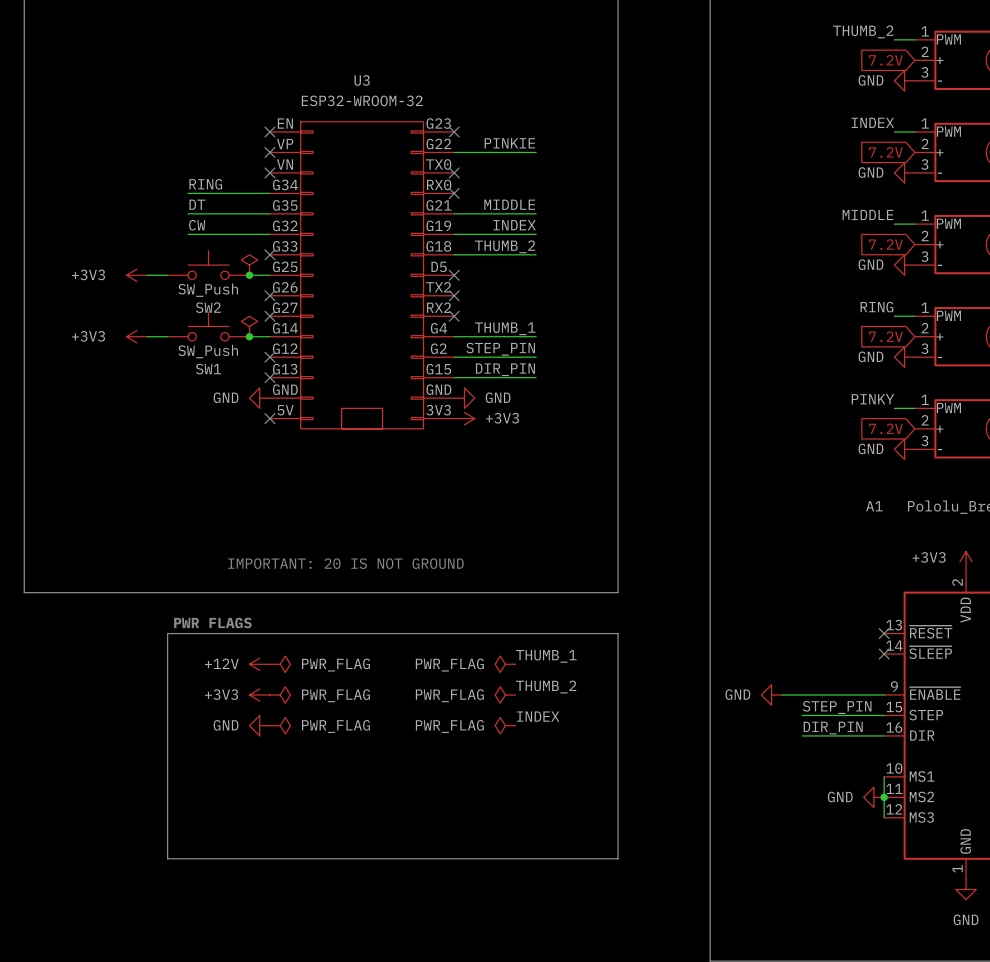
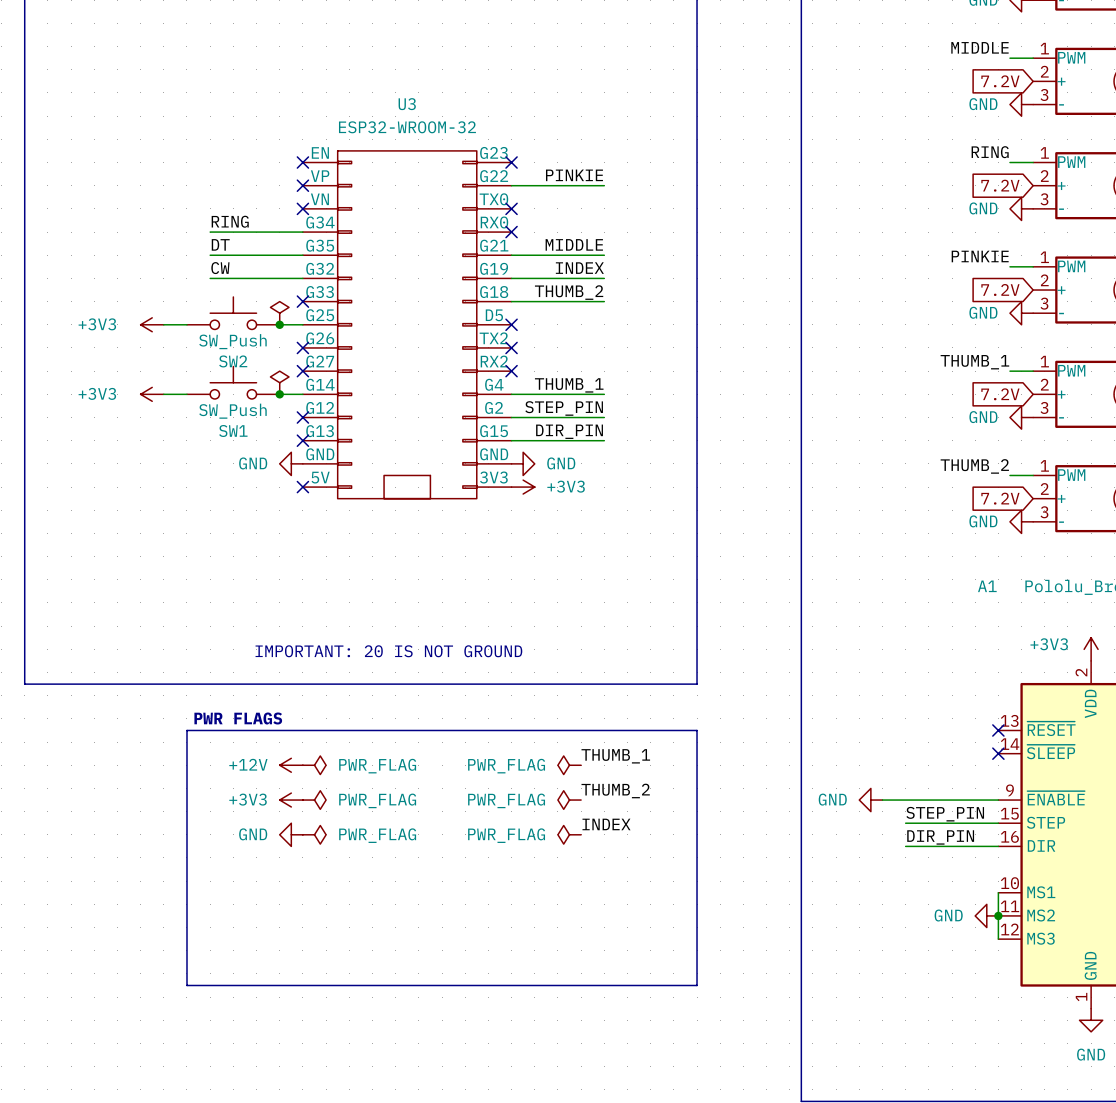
label: THUMB_2 (863, 31) -> MIDDLE (979, 47)
label: INDEX (872, 122) -> RING (990, 152)
label: MIDDLE (867, 214) -> PINKIE (980, 256)
label: RING (876, 307) -> THUMB_1 (974, 362)
label: PINKY (872, 399) -> THUMB_2 (974, 466)

